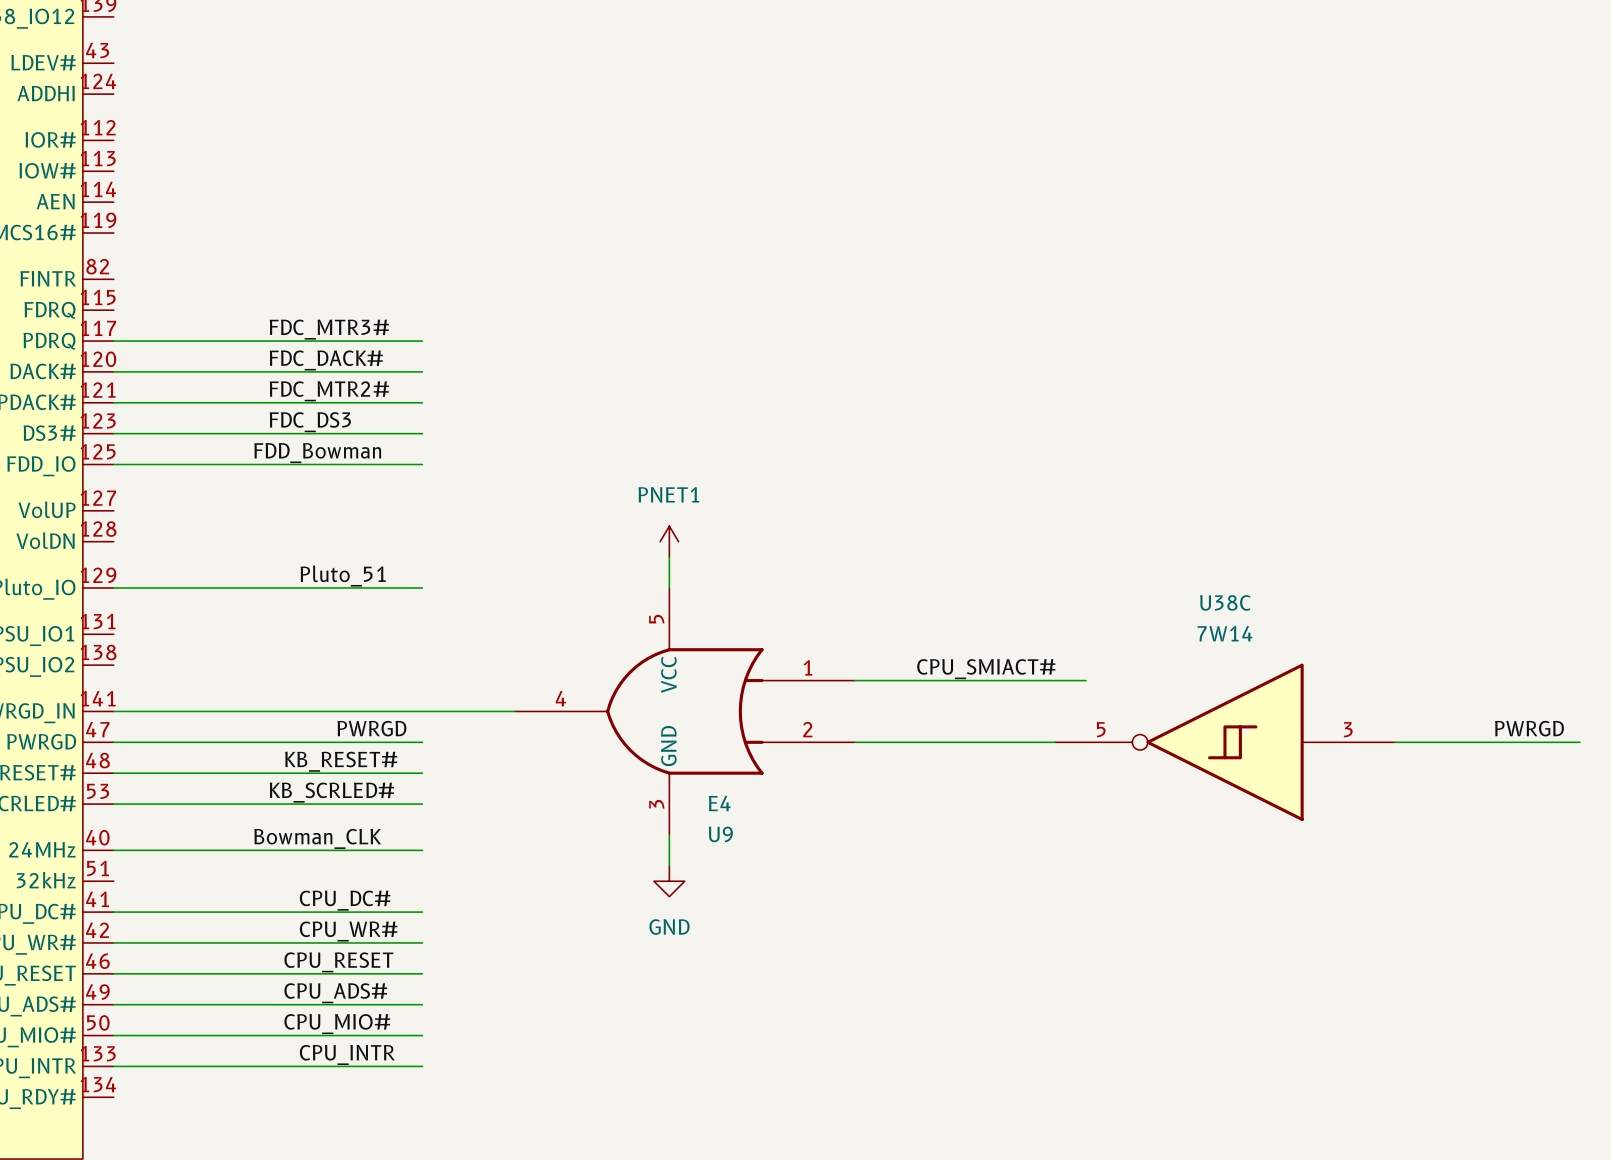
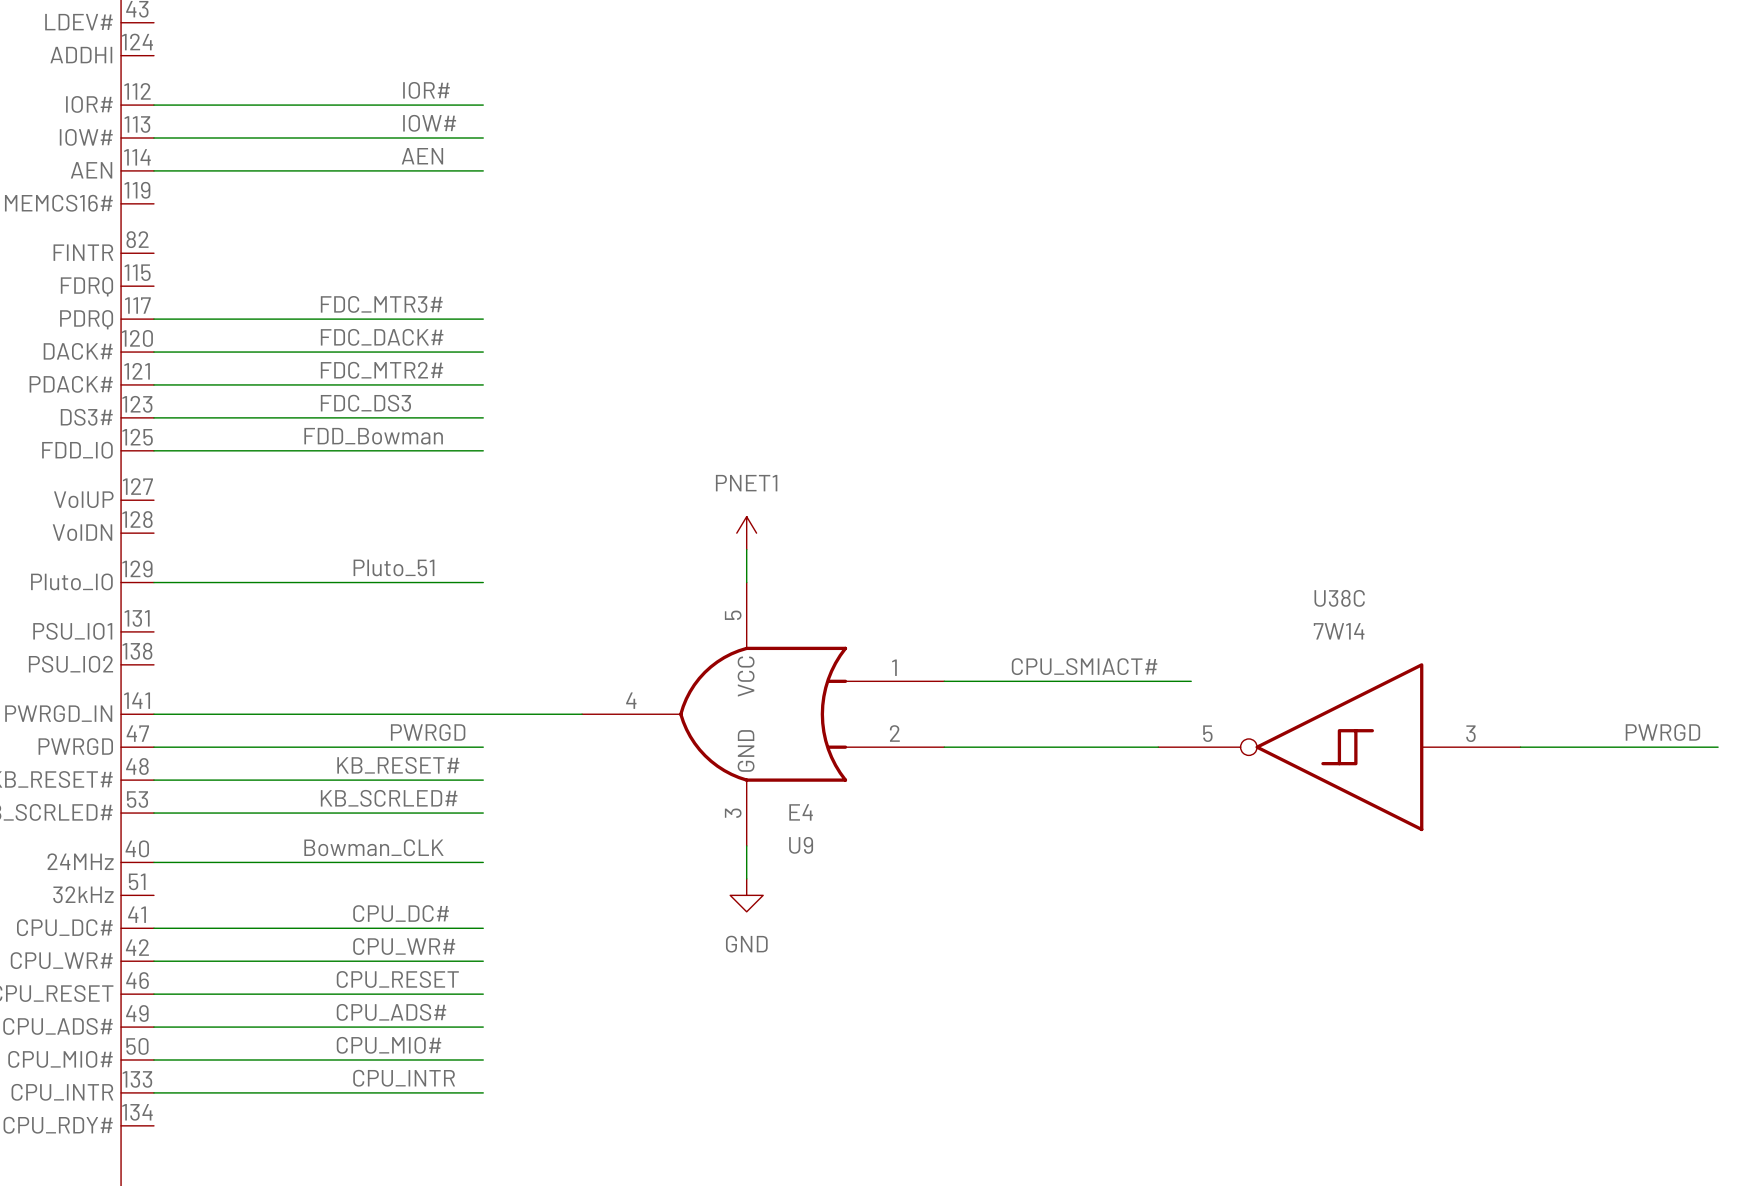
label: none -> IOR# (426, 90)
wire: none -> (153, 105) (483, 105)
label: none -> IOW# (429, 123)
wire: none -> (153, 138) (483, 138)
label: none -> AEN (422, 156)
wire: none -> (153, 170) (483, 170)

